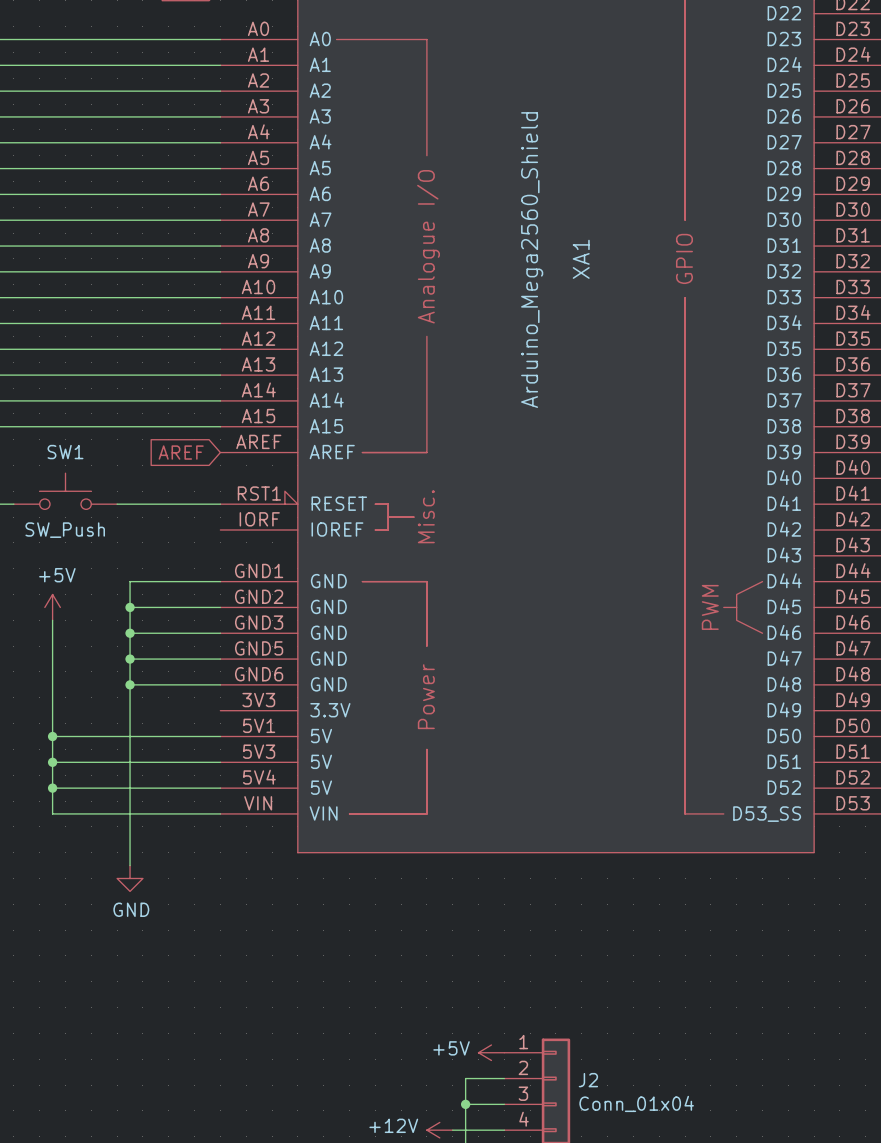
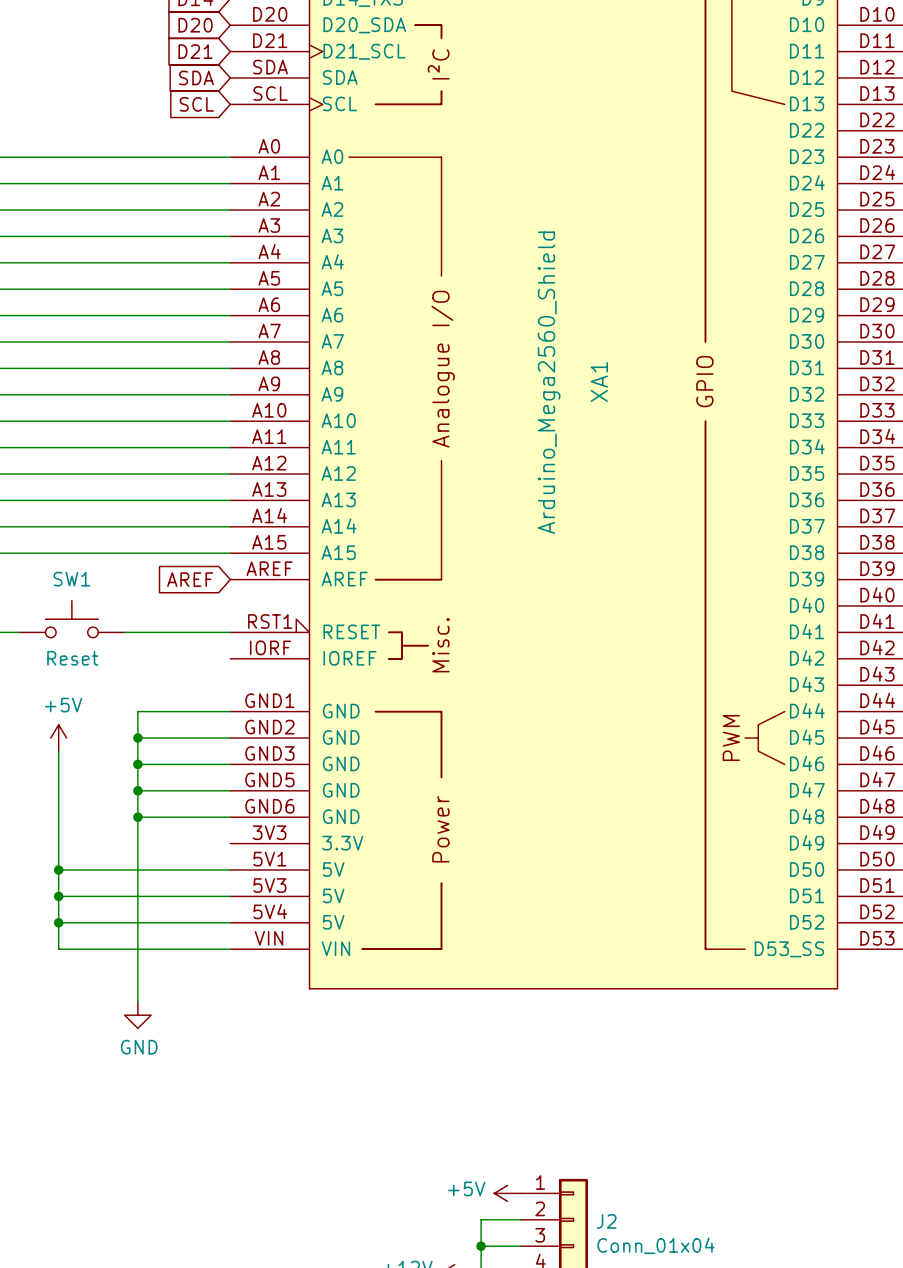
SW1 value: SW_Push (65, 530) -> Reset (72, 658)

